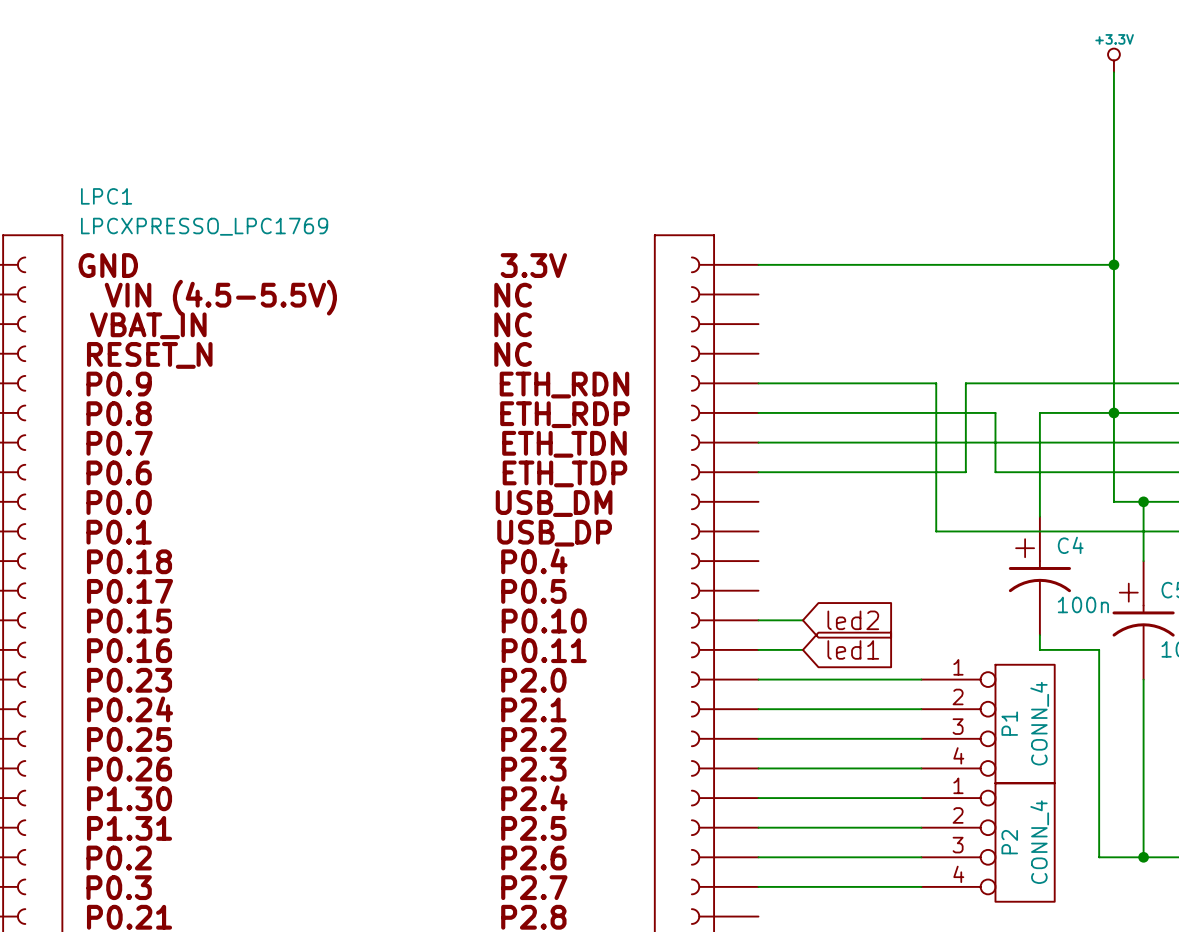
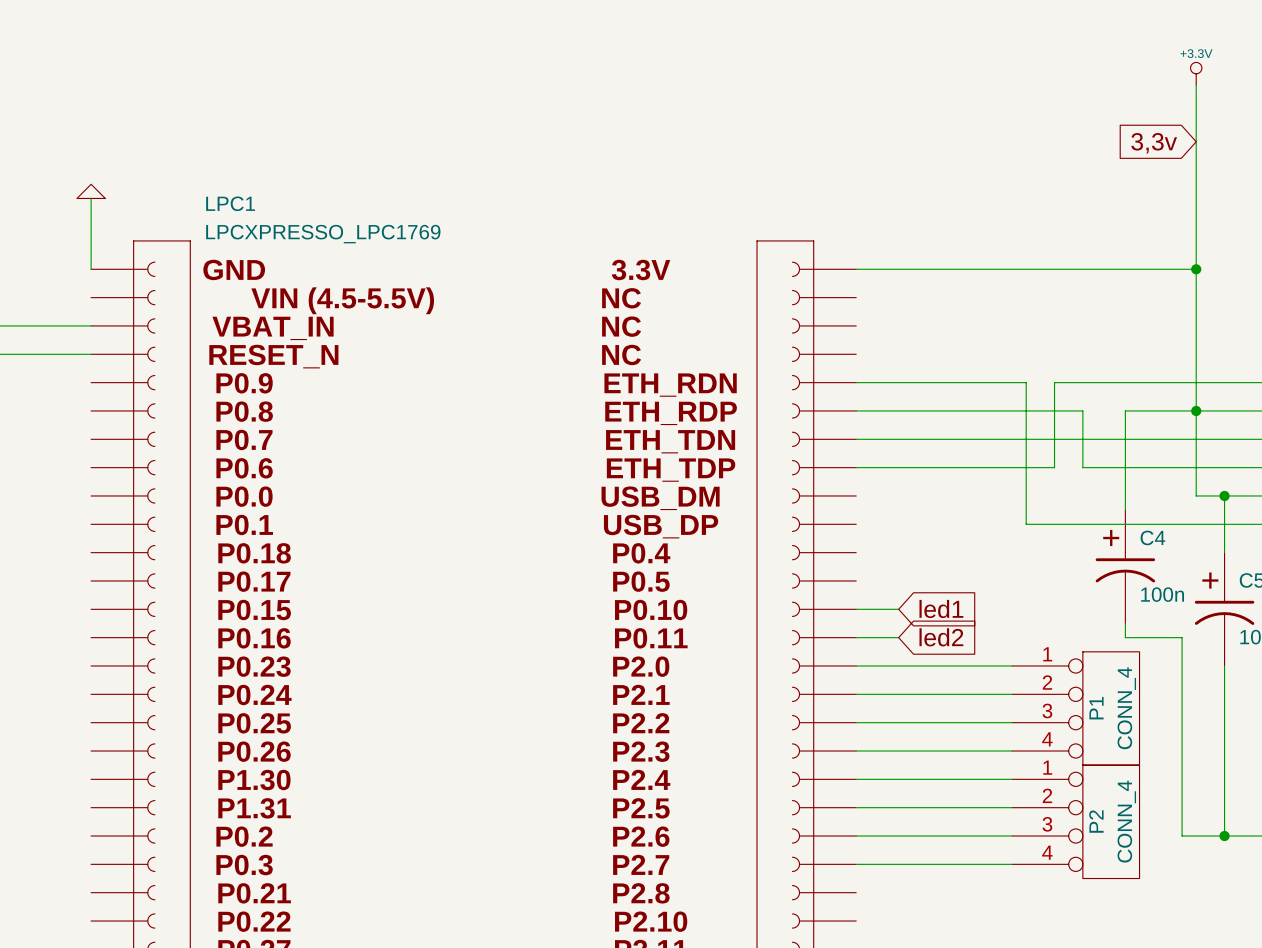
global label: none -> 3,3v (1154, 143)
global label: led2 (853, 620) -> led1 (941, 608)
global label: led1 (853, 649) -> led2 (941, 637)

